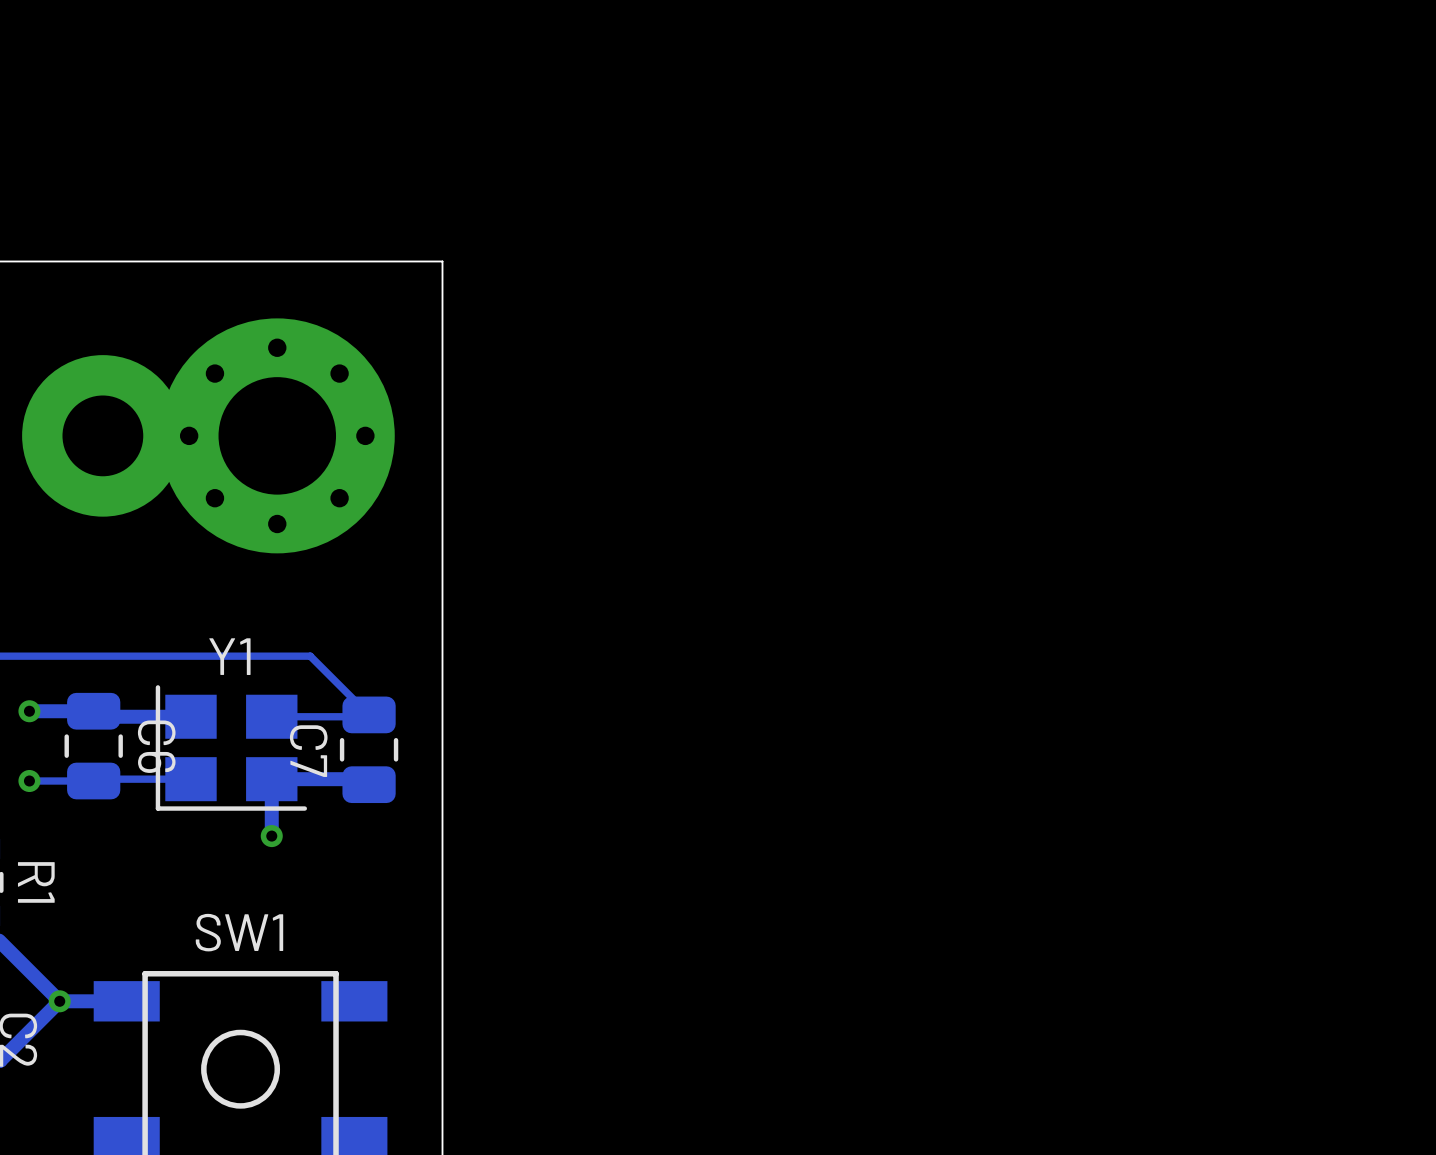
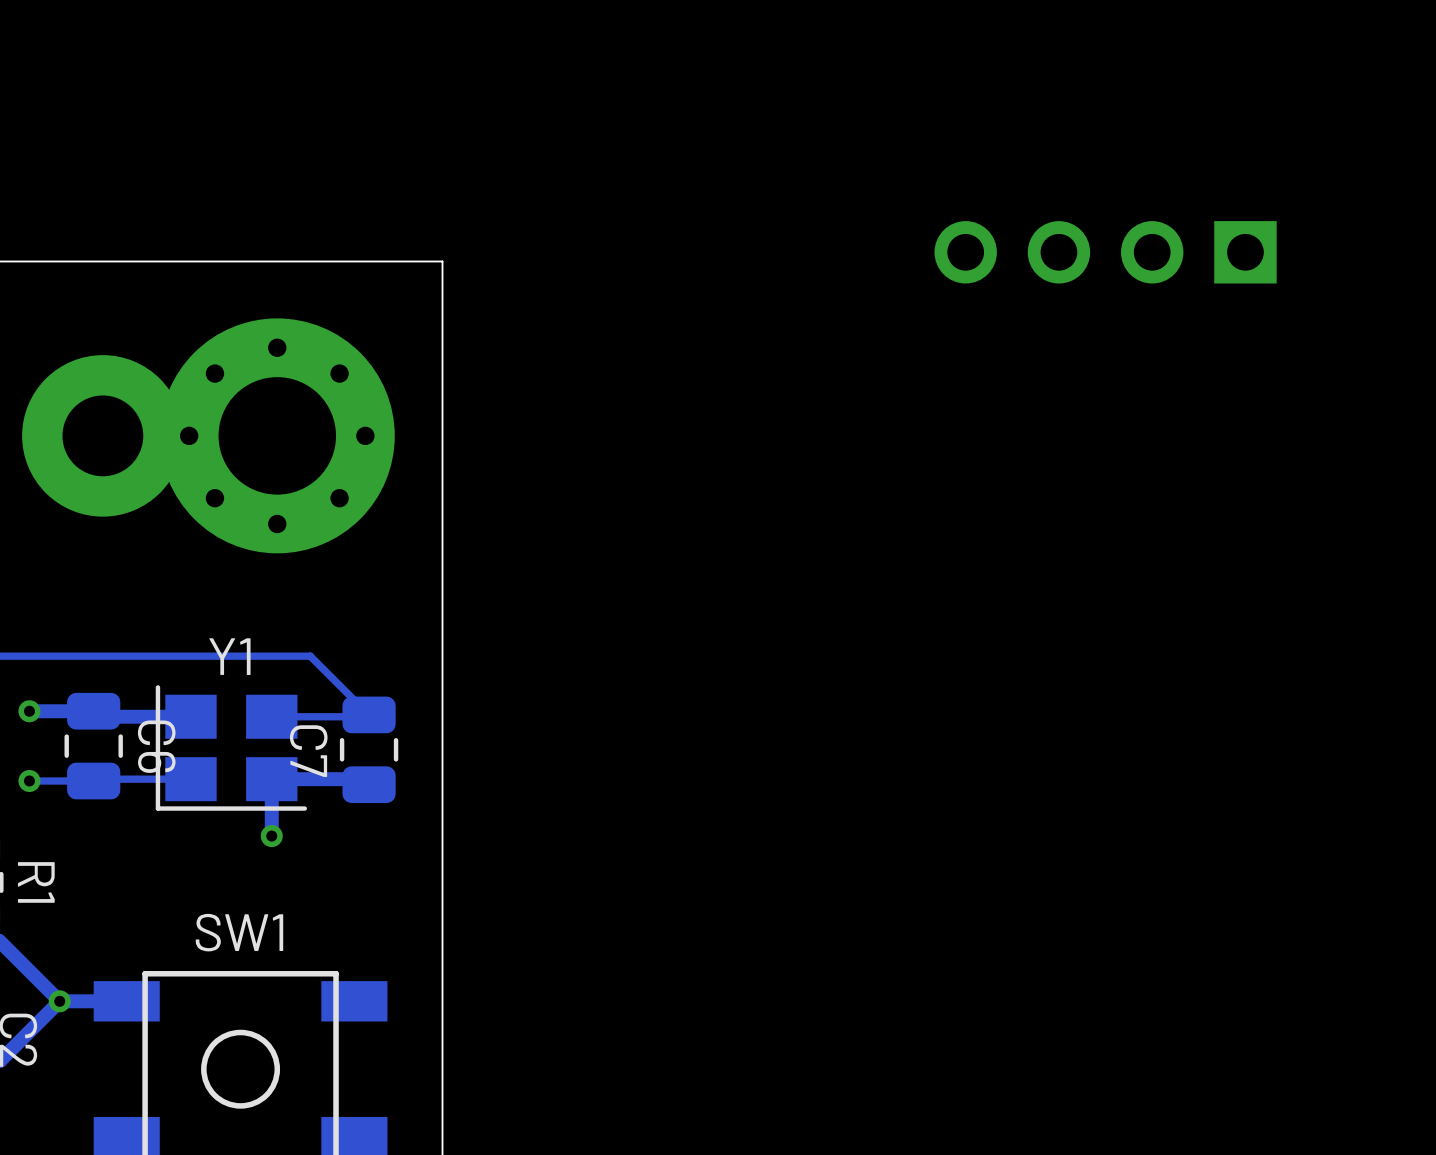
part: none -> (1105, 252)

